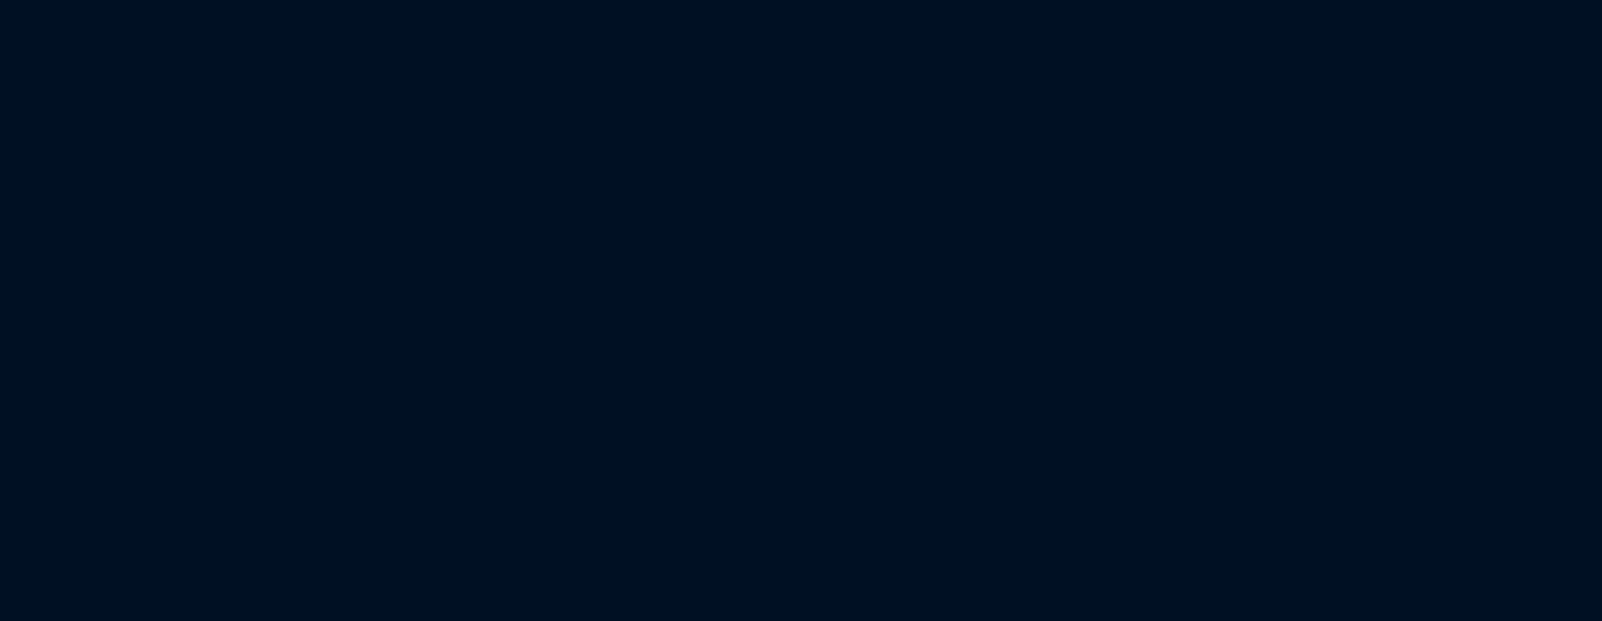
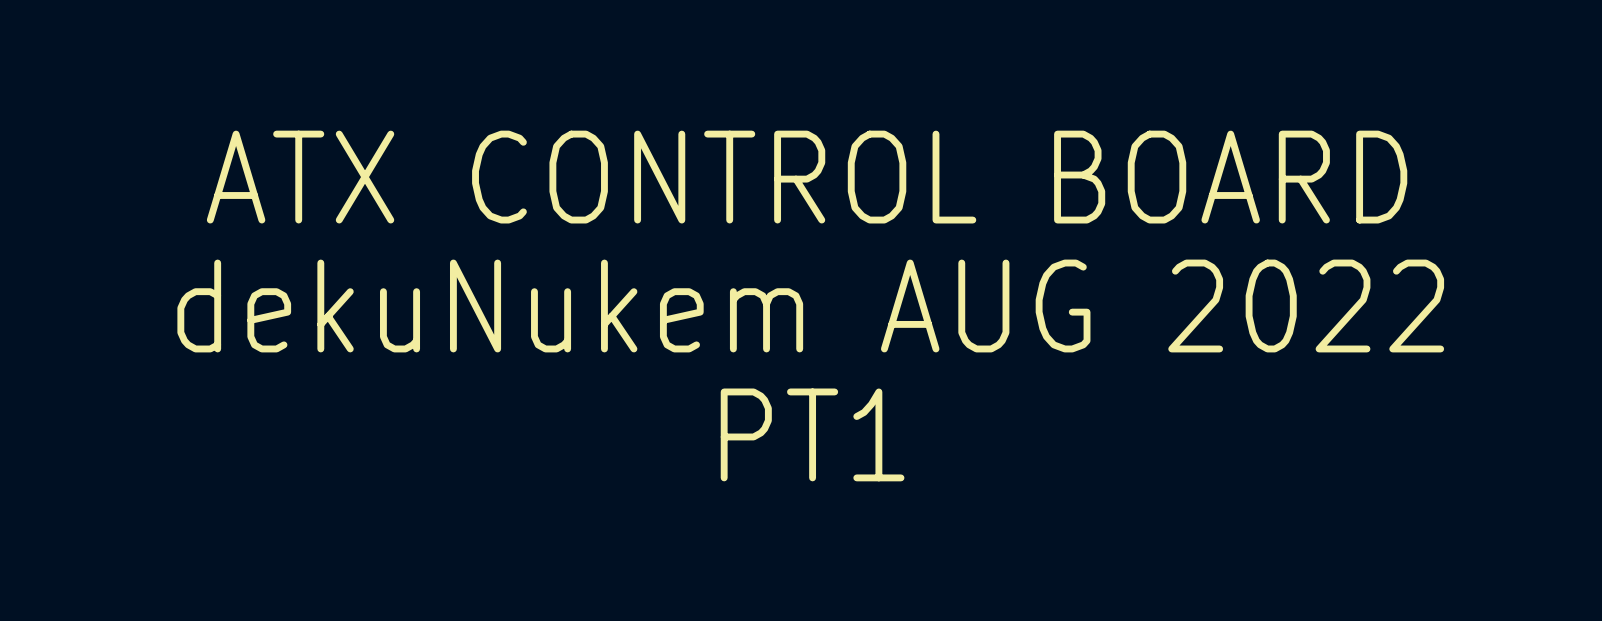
text: none -> ATX CONTROL BOARD (807, 177)
text: none -> dekuNukem AUG 2022 (810, 305)
text: none -> PT1 (812, 434)

